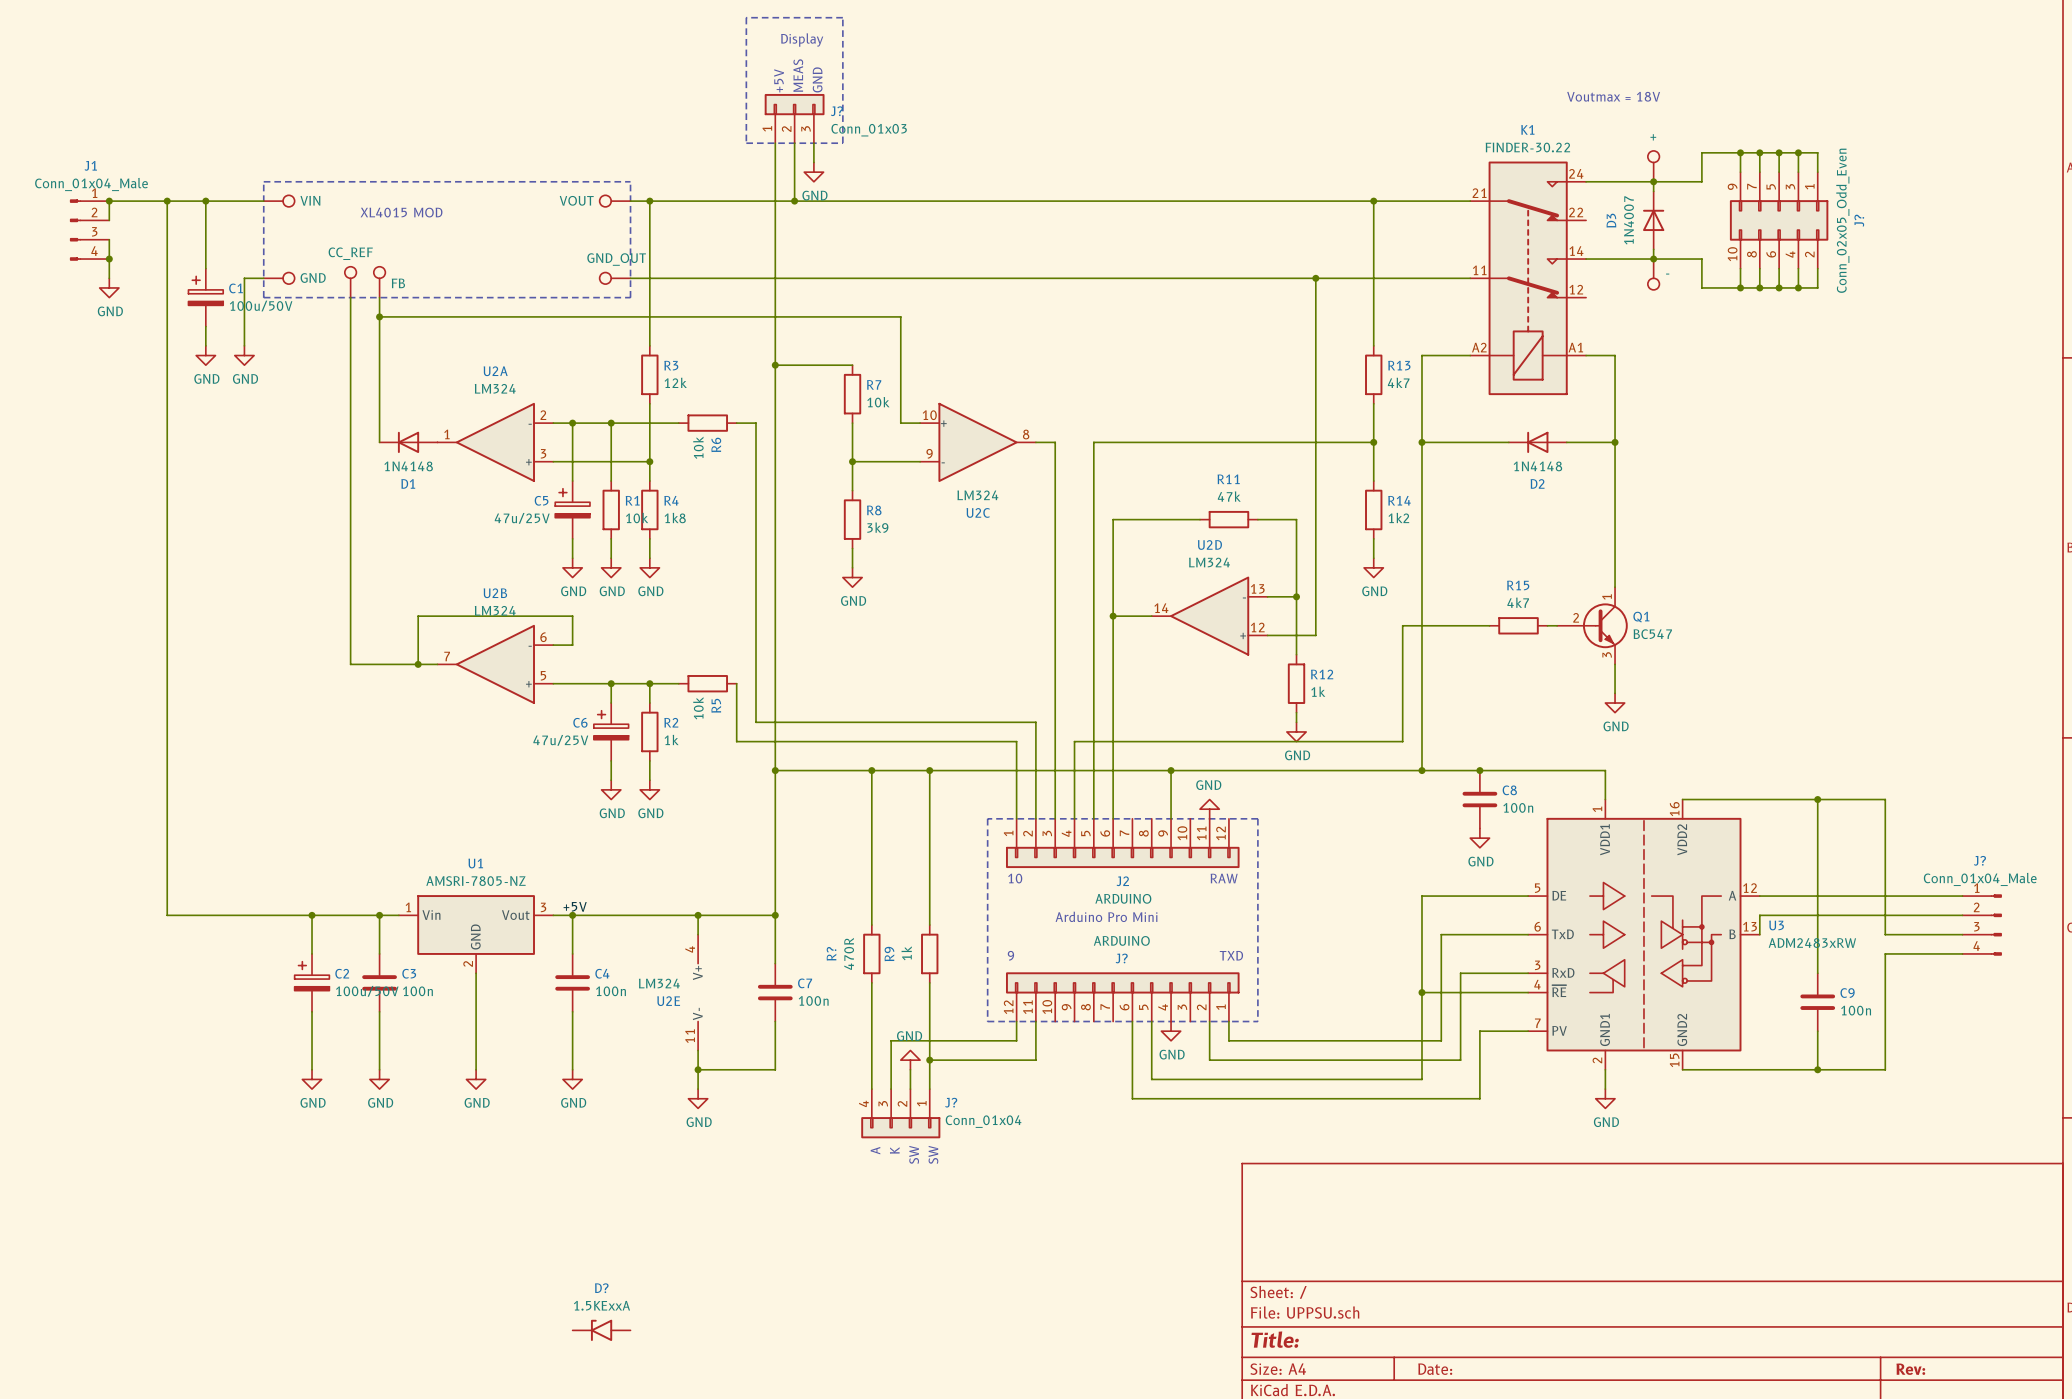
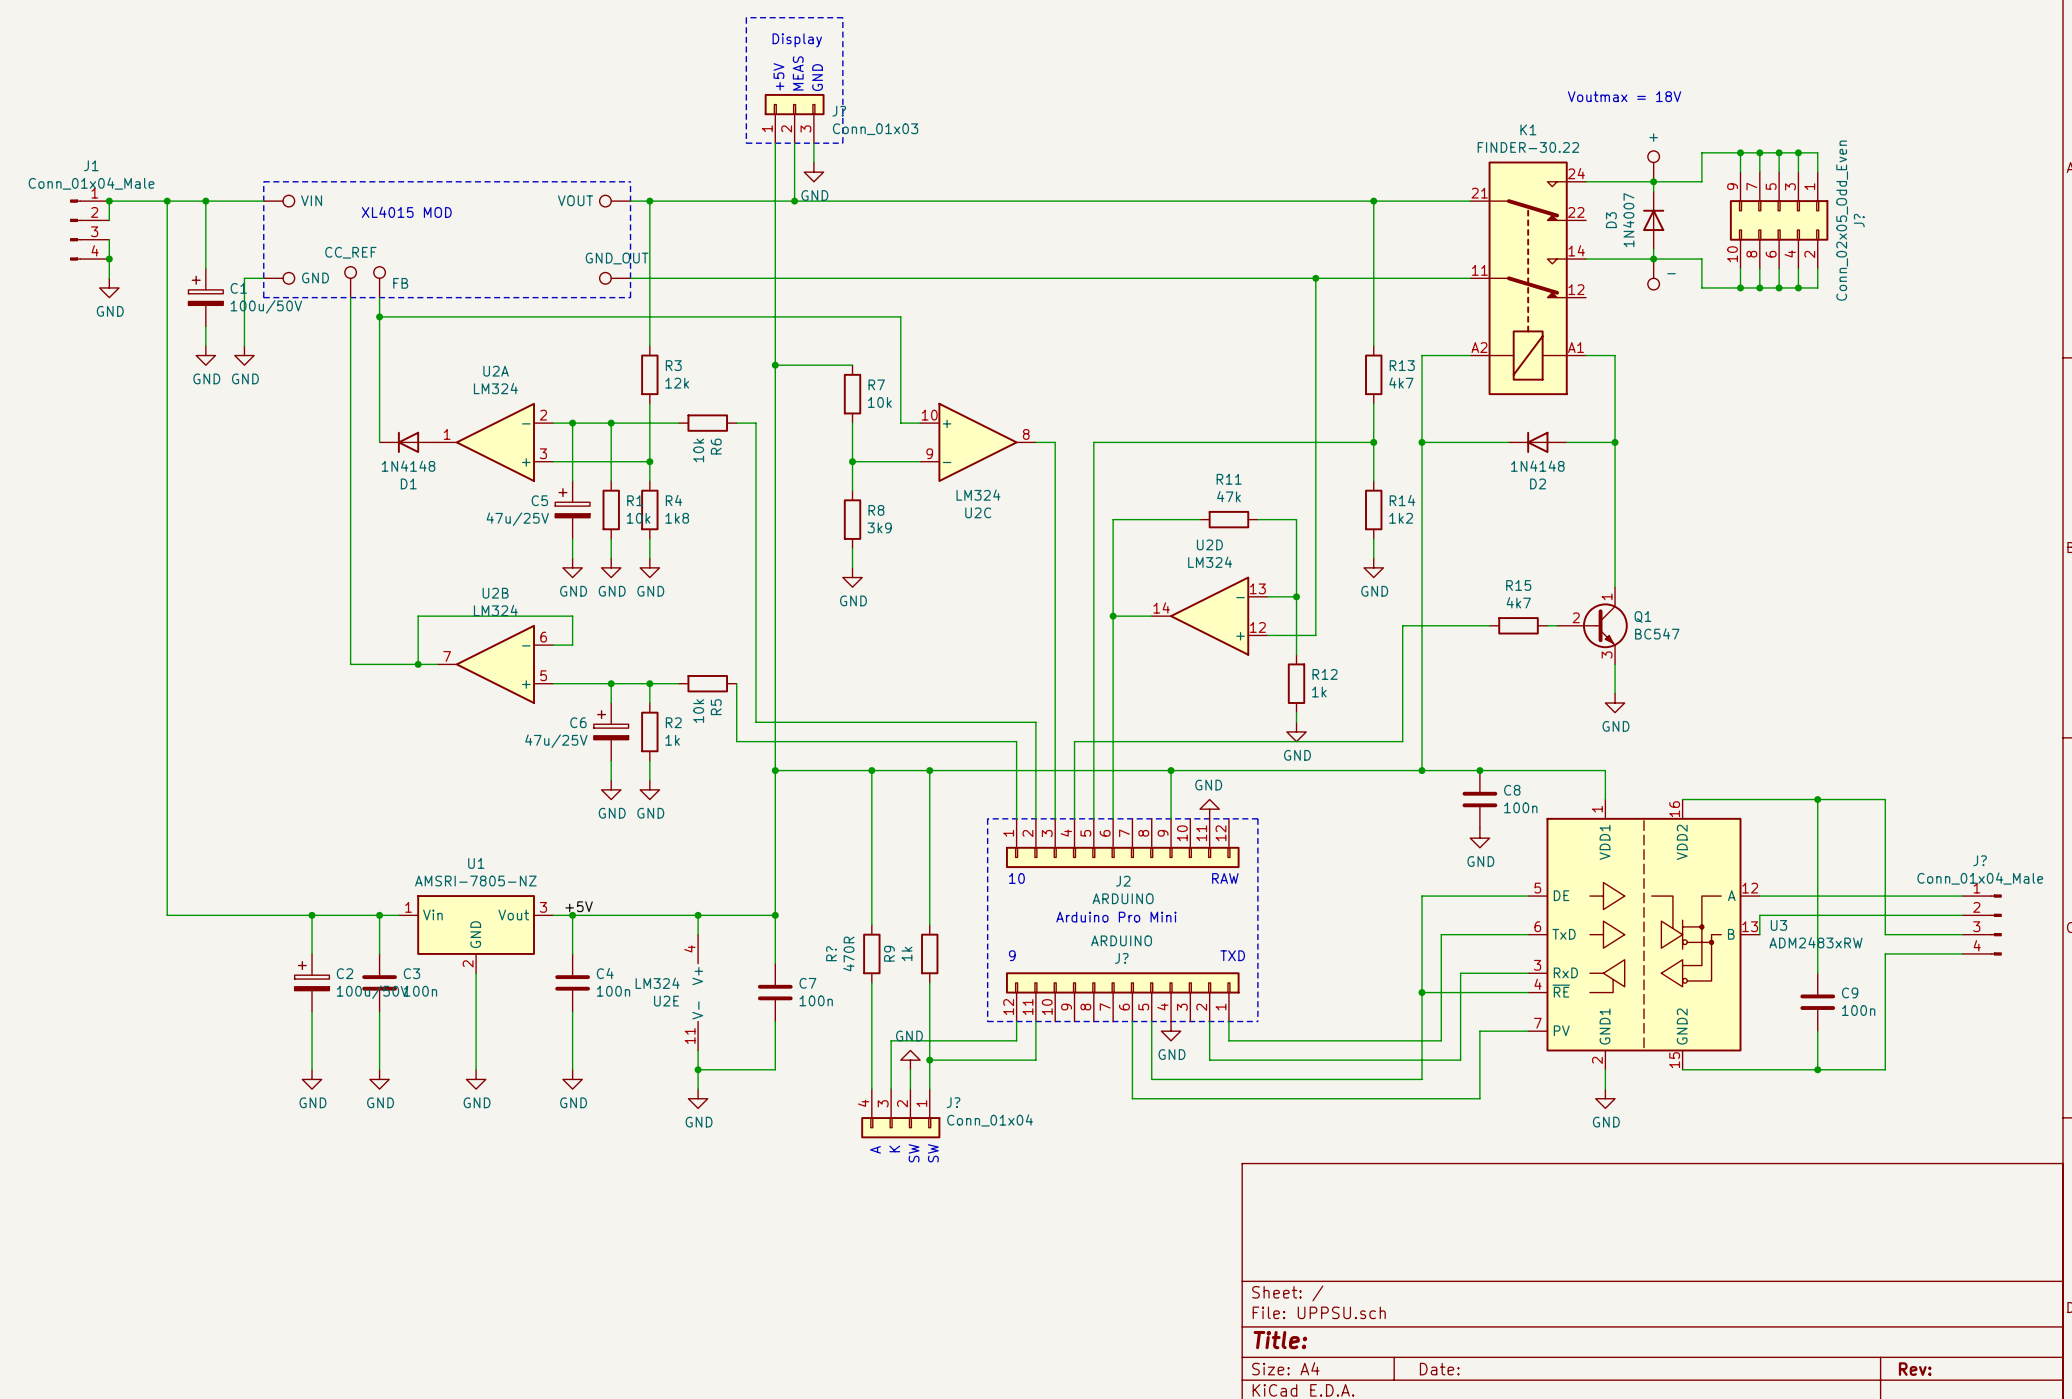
D?: 1.5KExxA (601, 1330) -> none

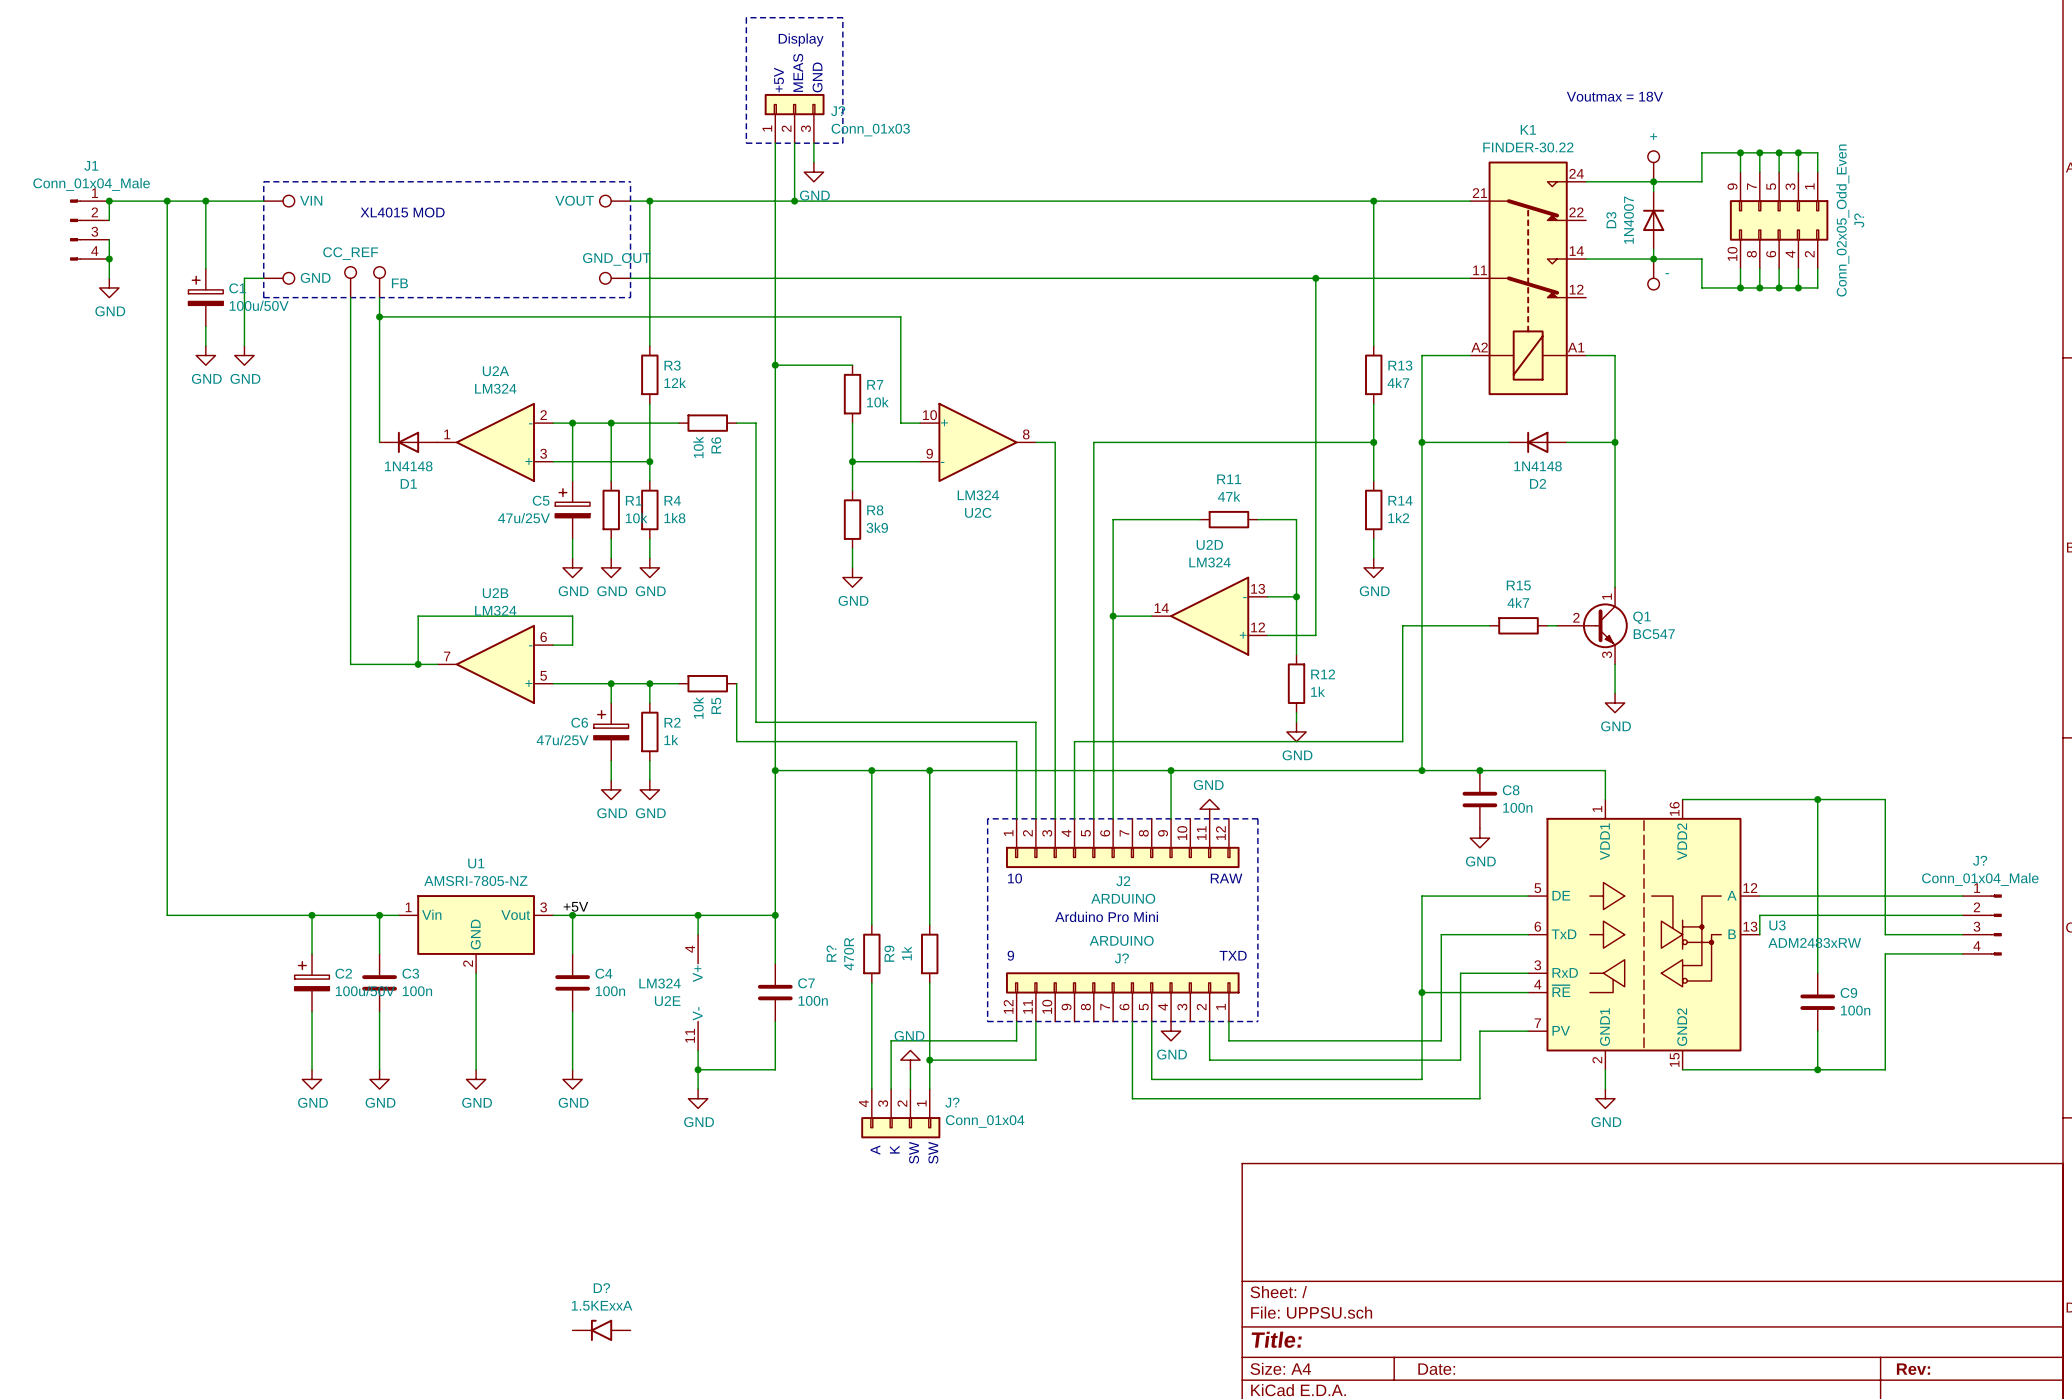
D?: none -> 1.5KExxA (601, 1330)

